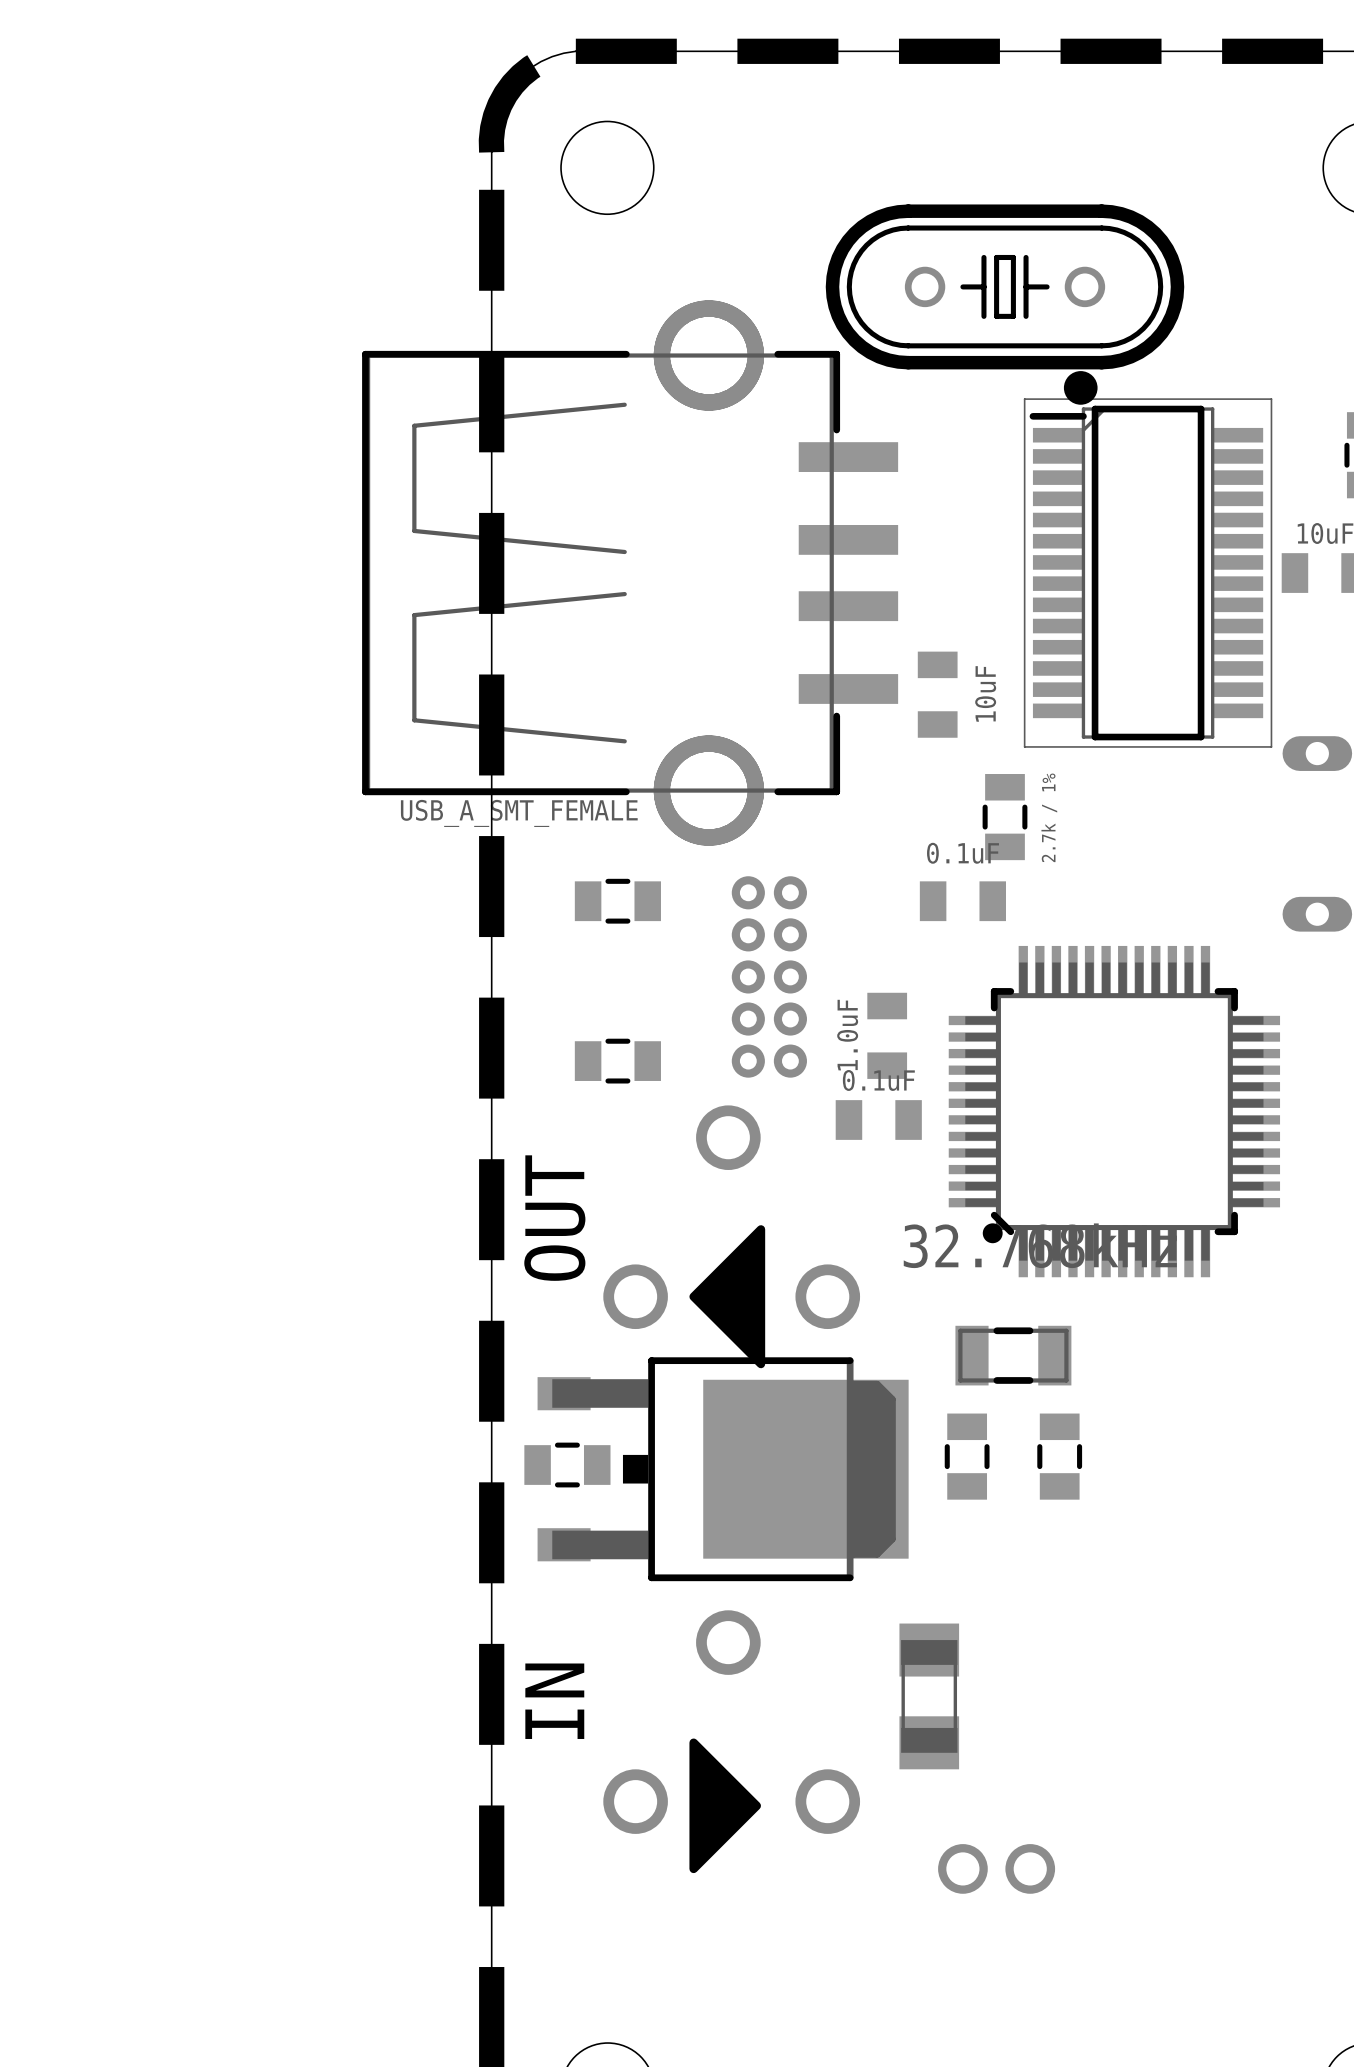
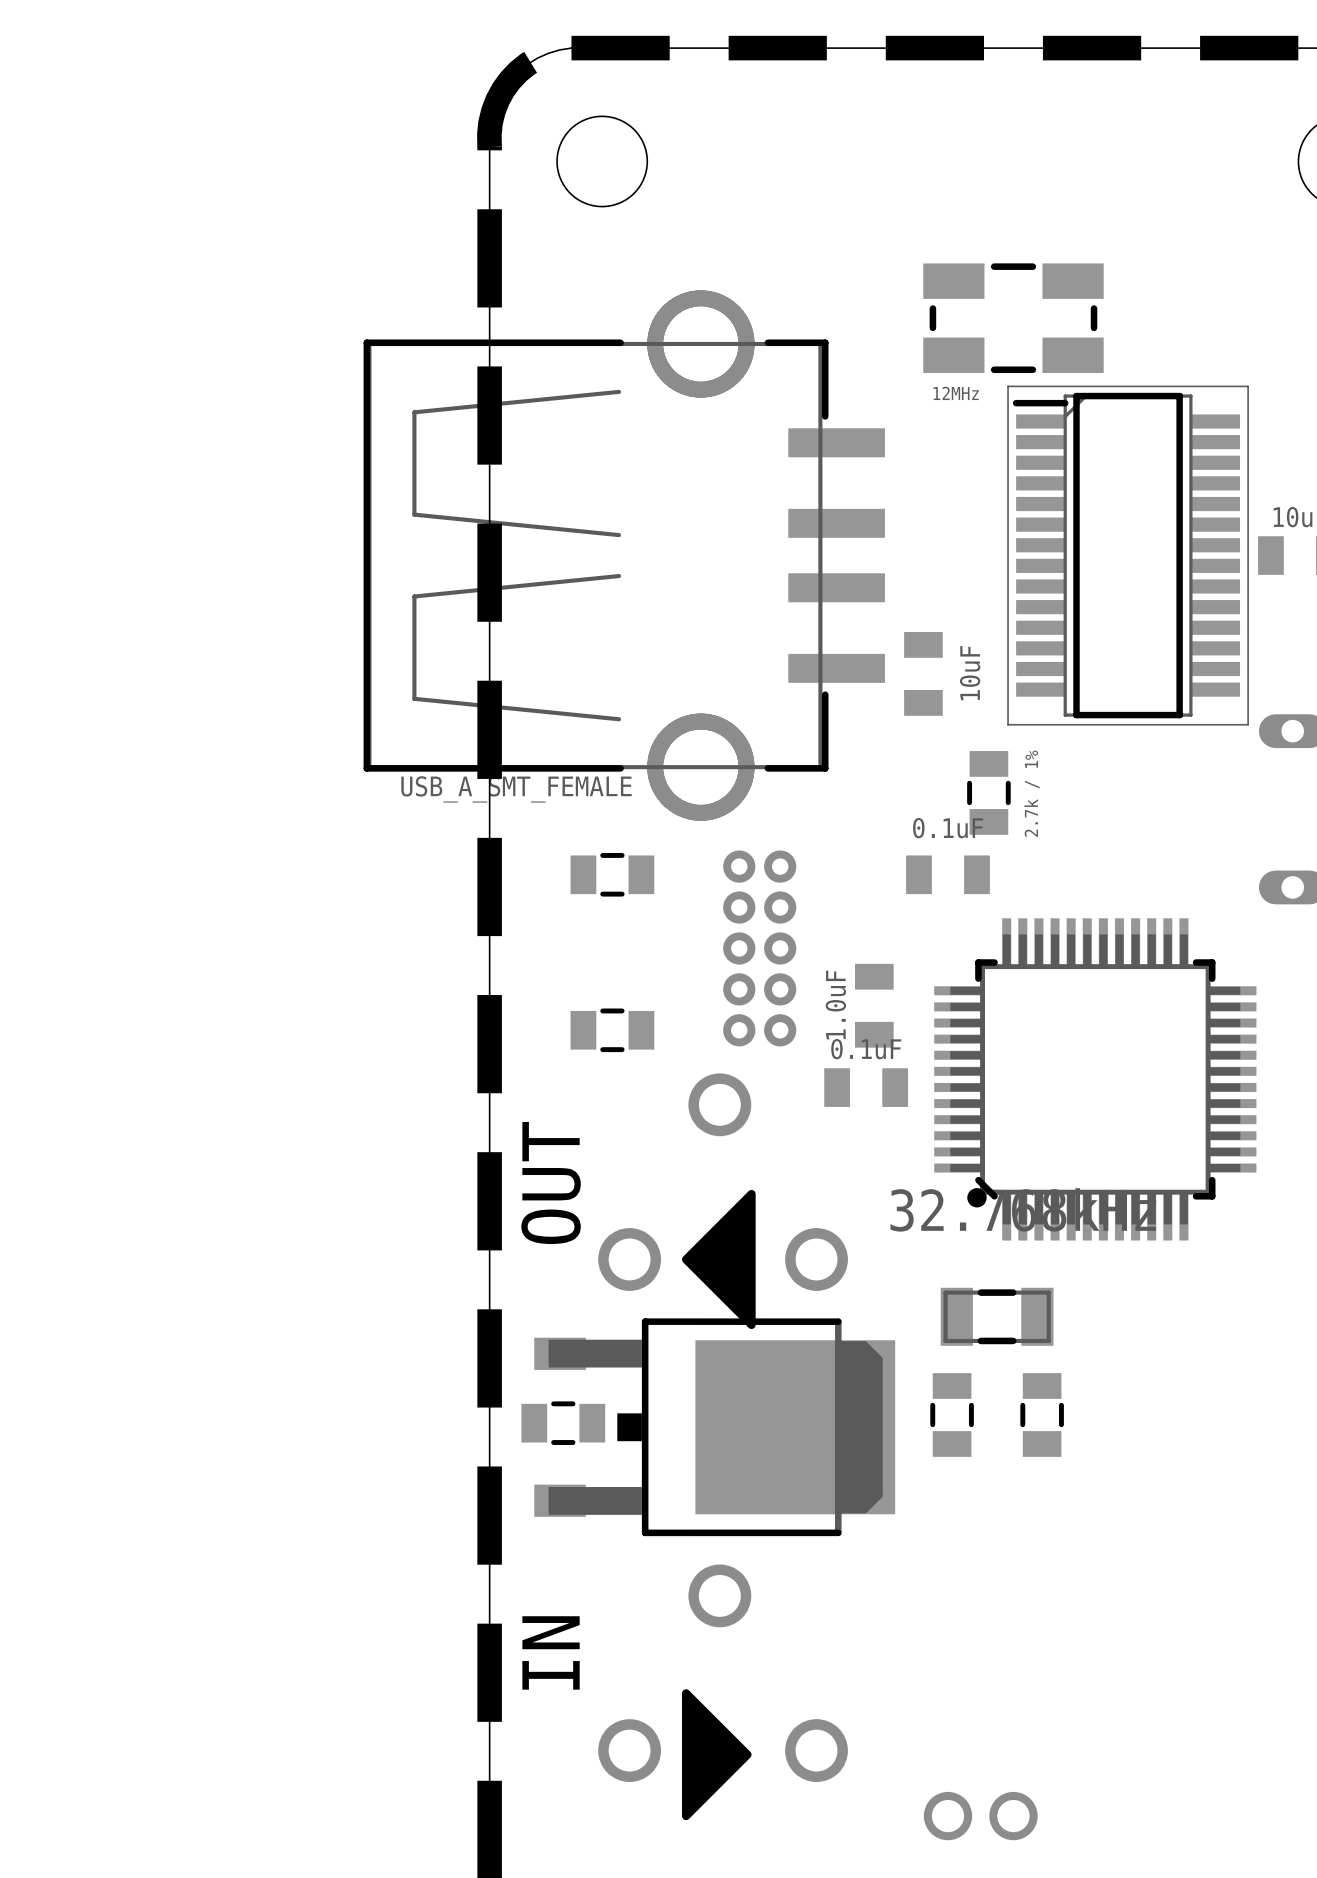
part: (1005, 286) -> none
part: none -> 12MHz (1013, 318)
drawing: [1063, 371, 1098, 405] -> none
part: (929, 1696) -> none

